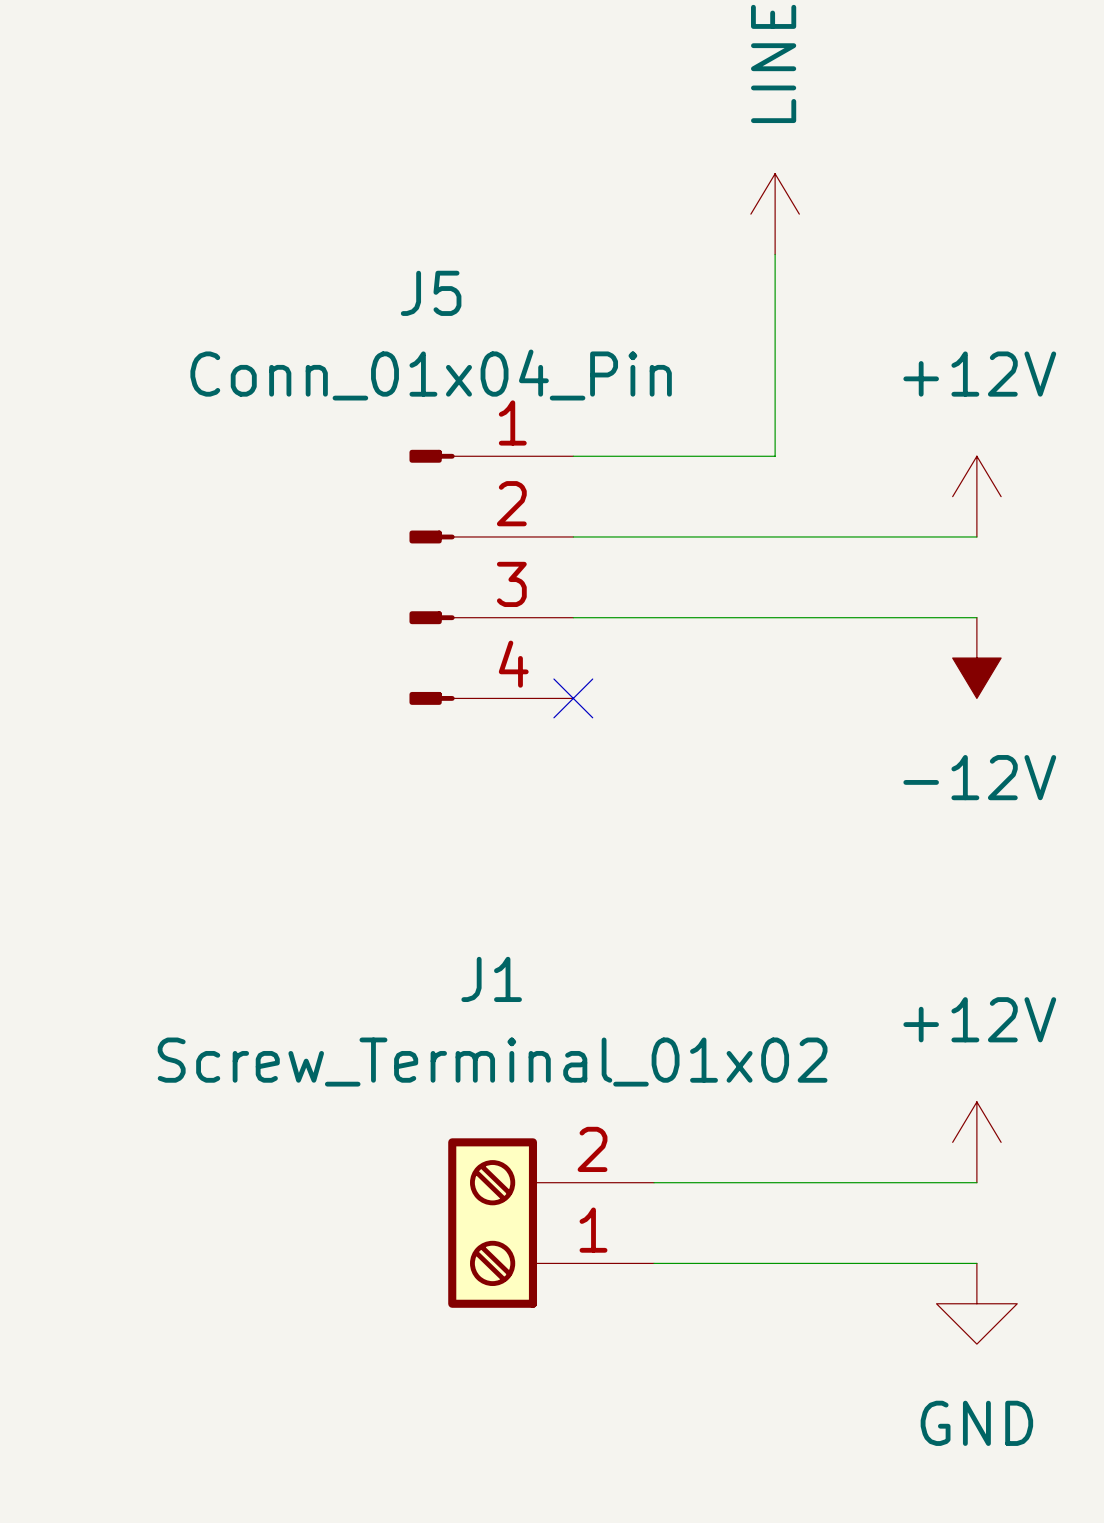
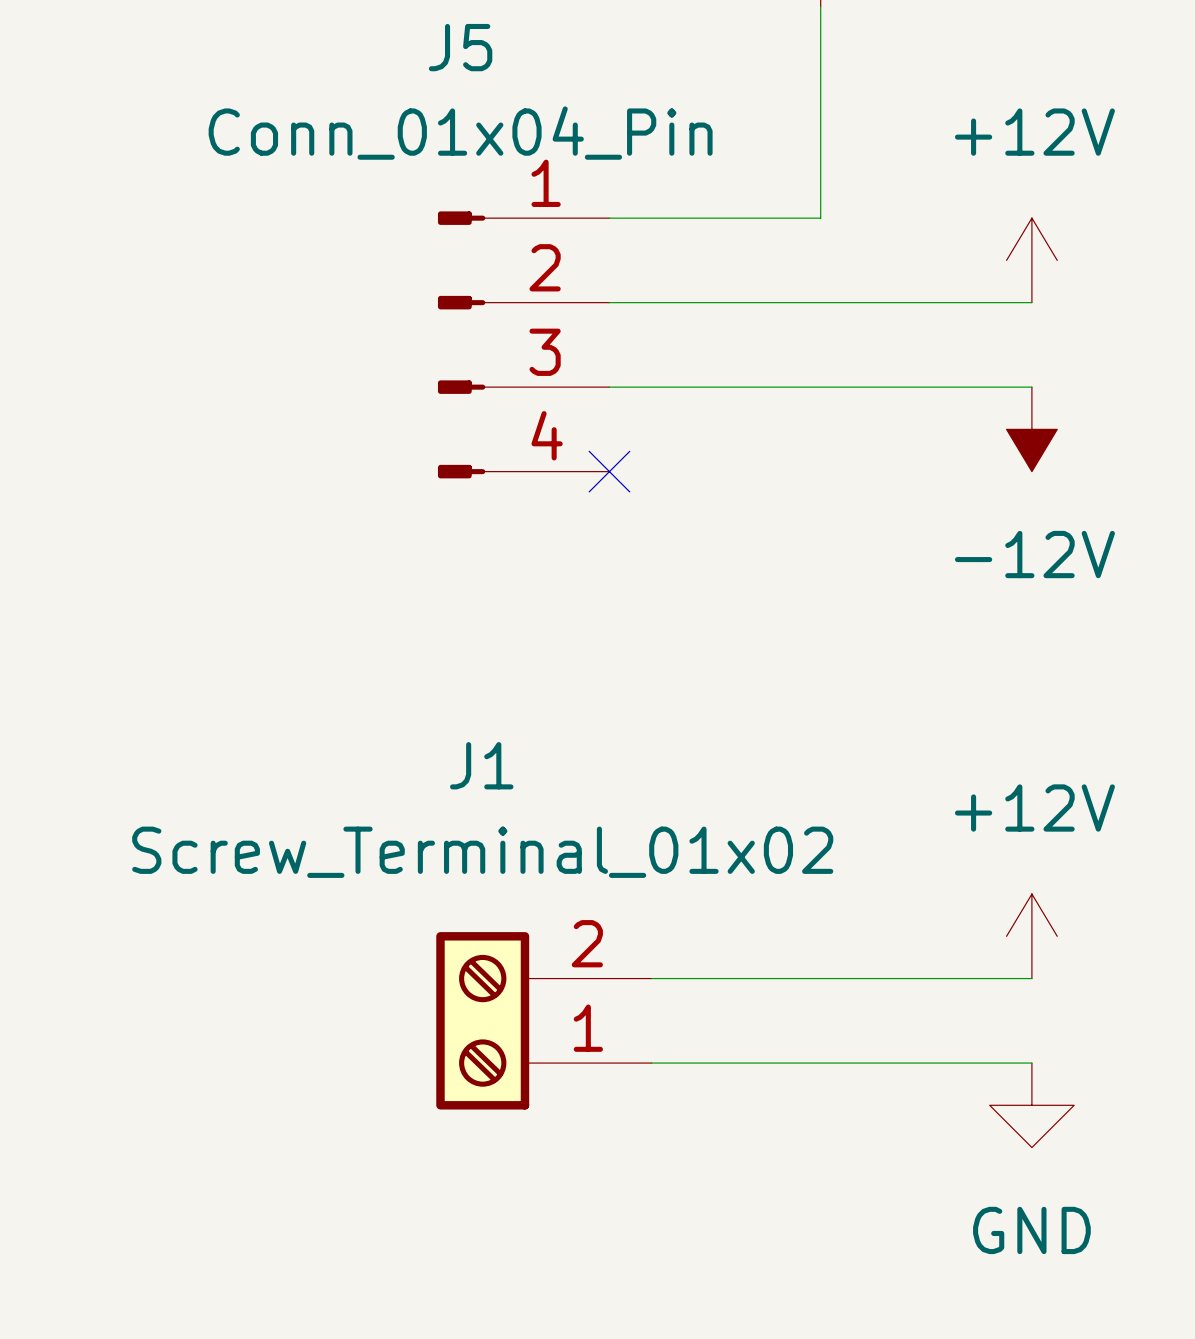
J1 position: (551, 1223) -> (543, 1020)

